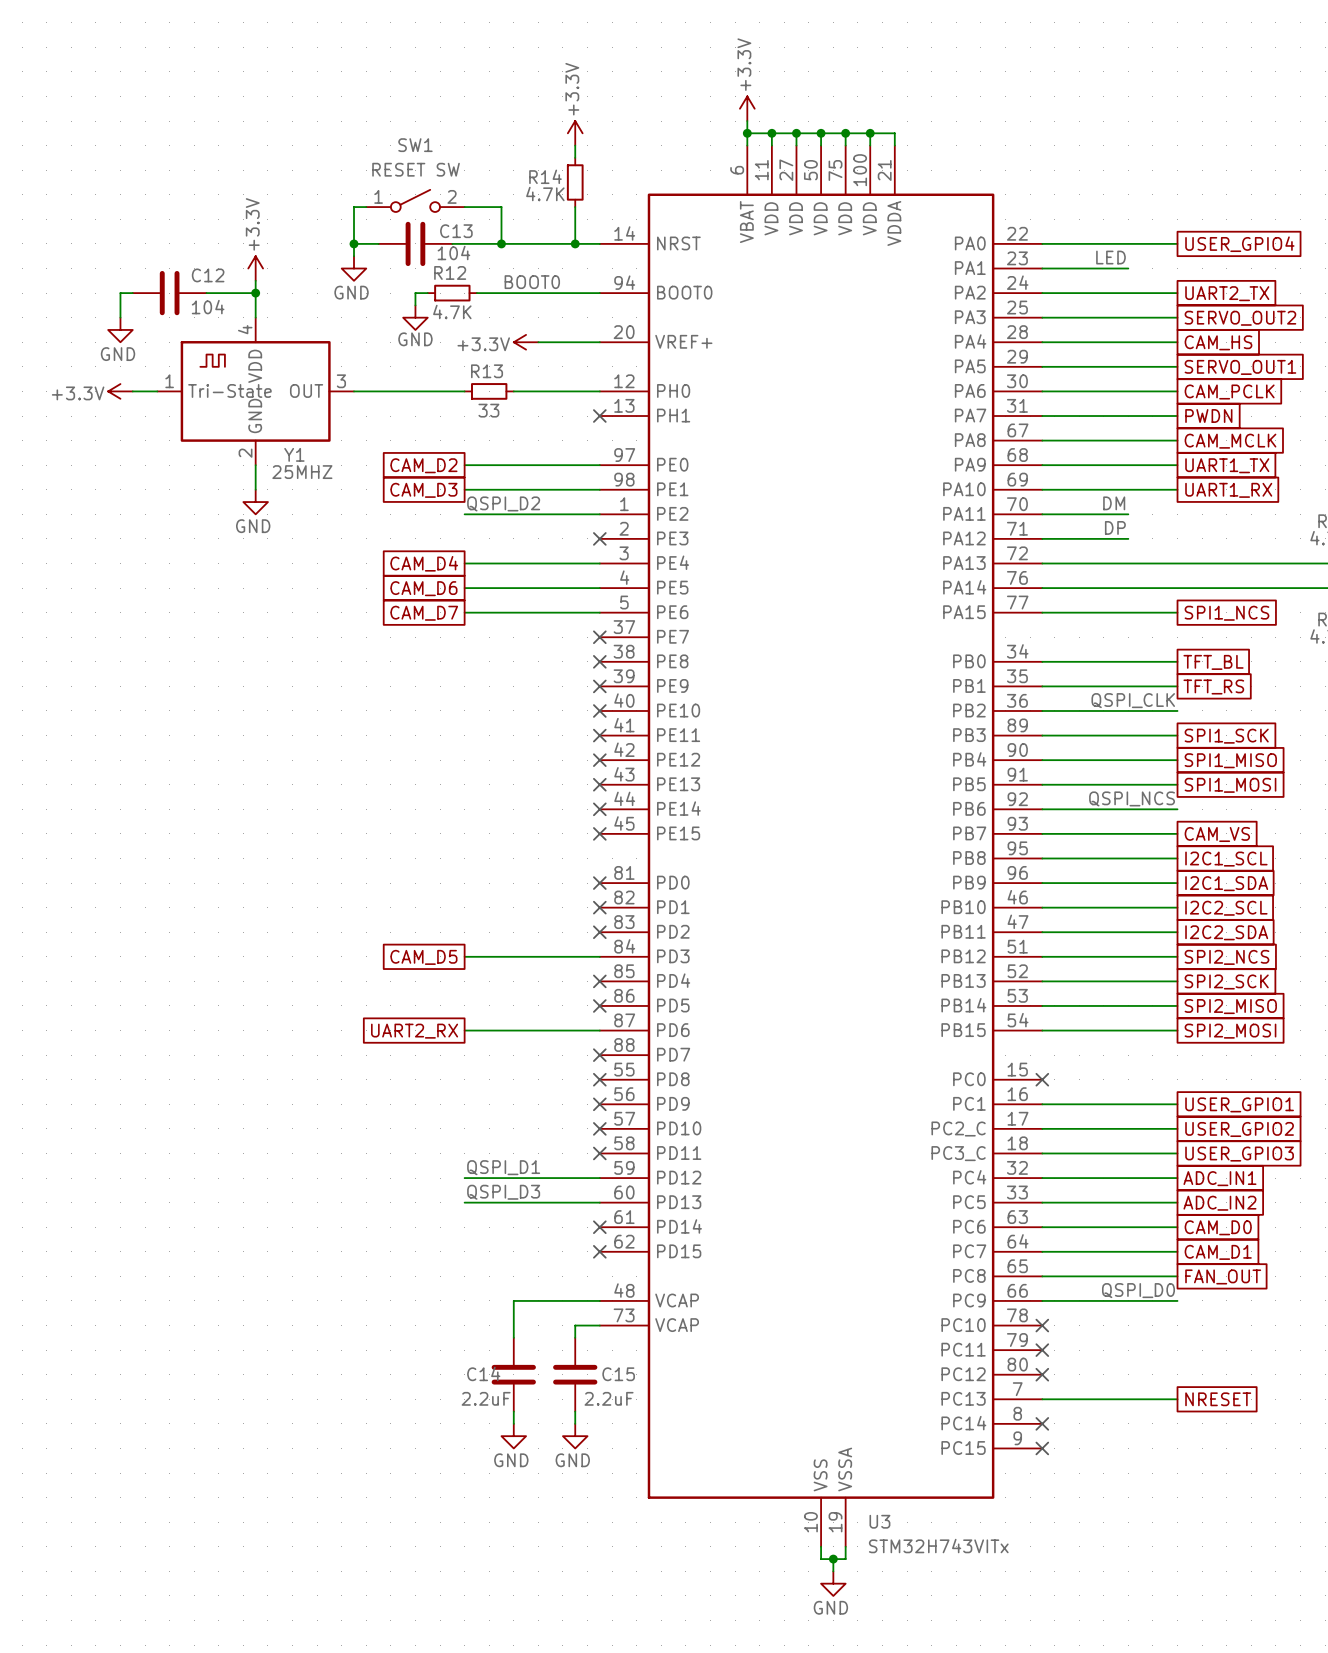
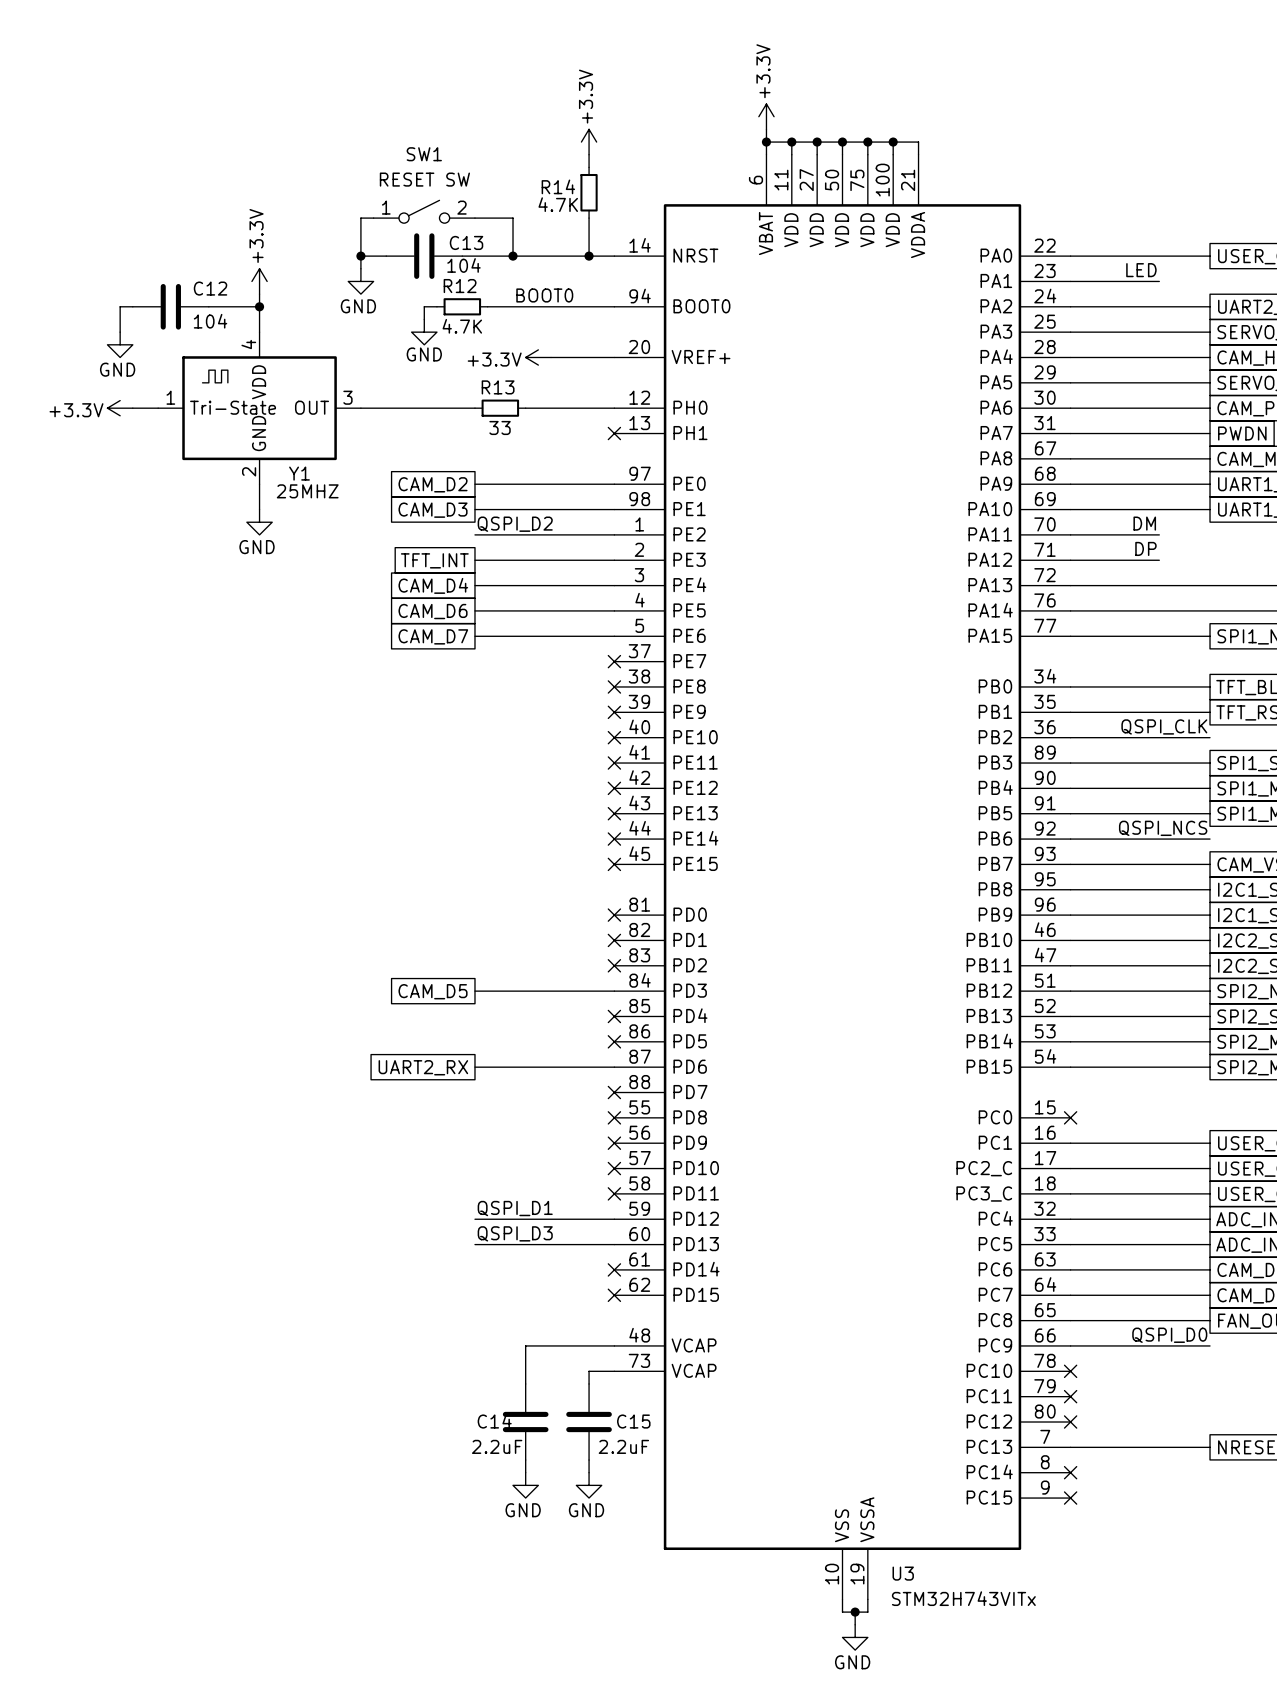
wire: none -> (474, 560) (614, 560)
no-connect mark: (599, 538) -> none
global label: none -> TFT_INT (434, 560)

